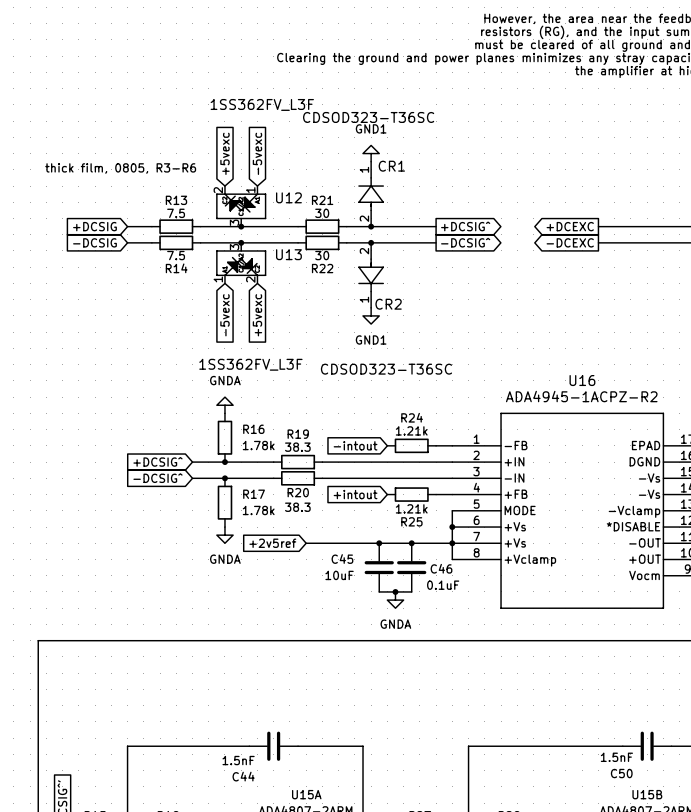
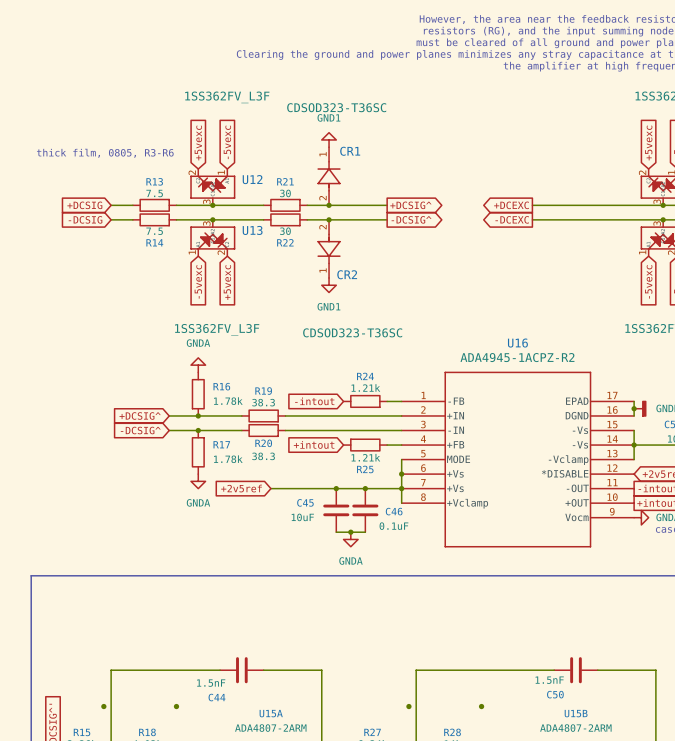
junction: none -> (103, 706)
junction: none -> (176, 706)
junction: none -> (408, 706)
junction: none -> (481, 706)

